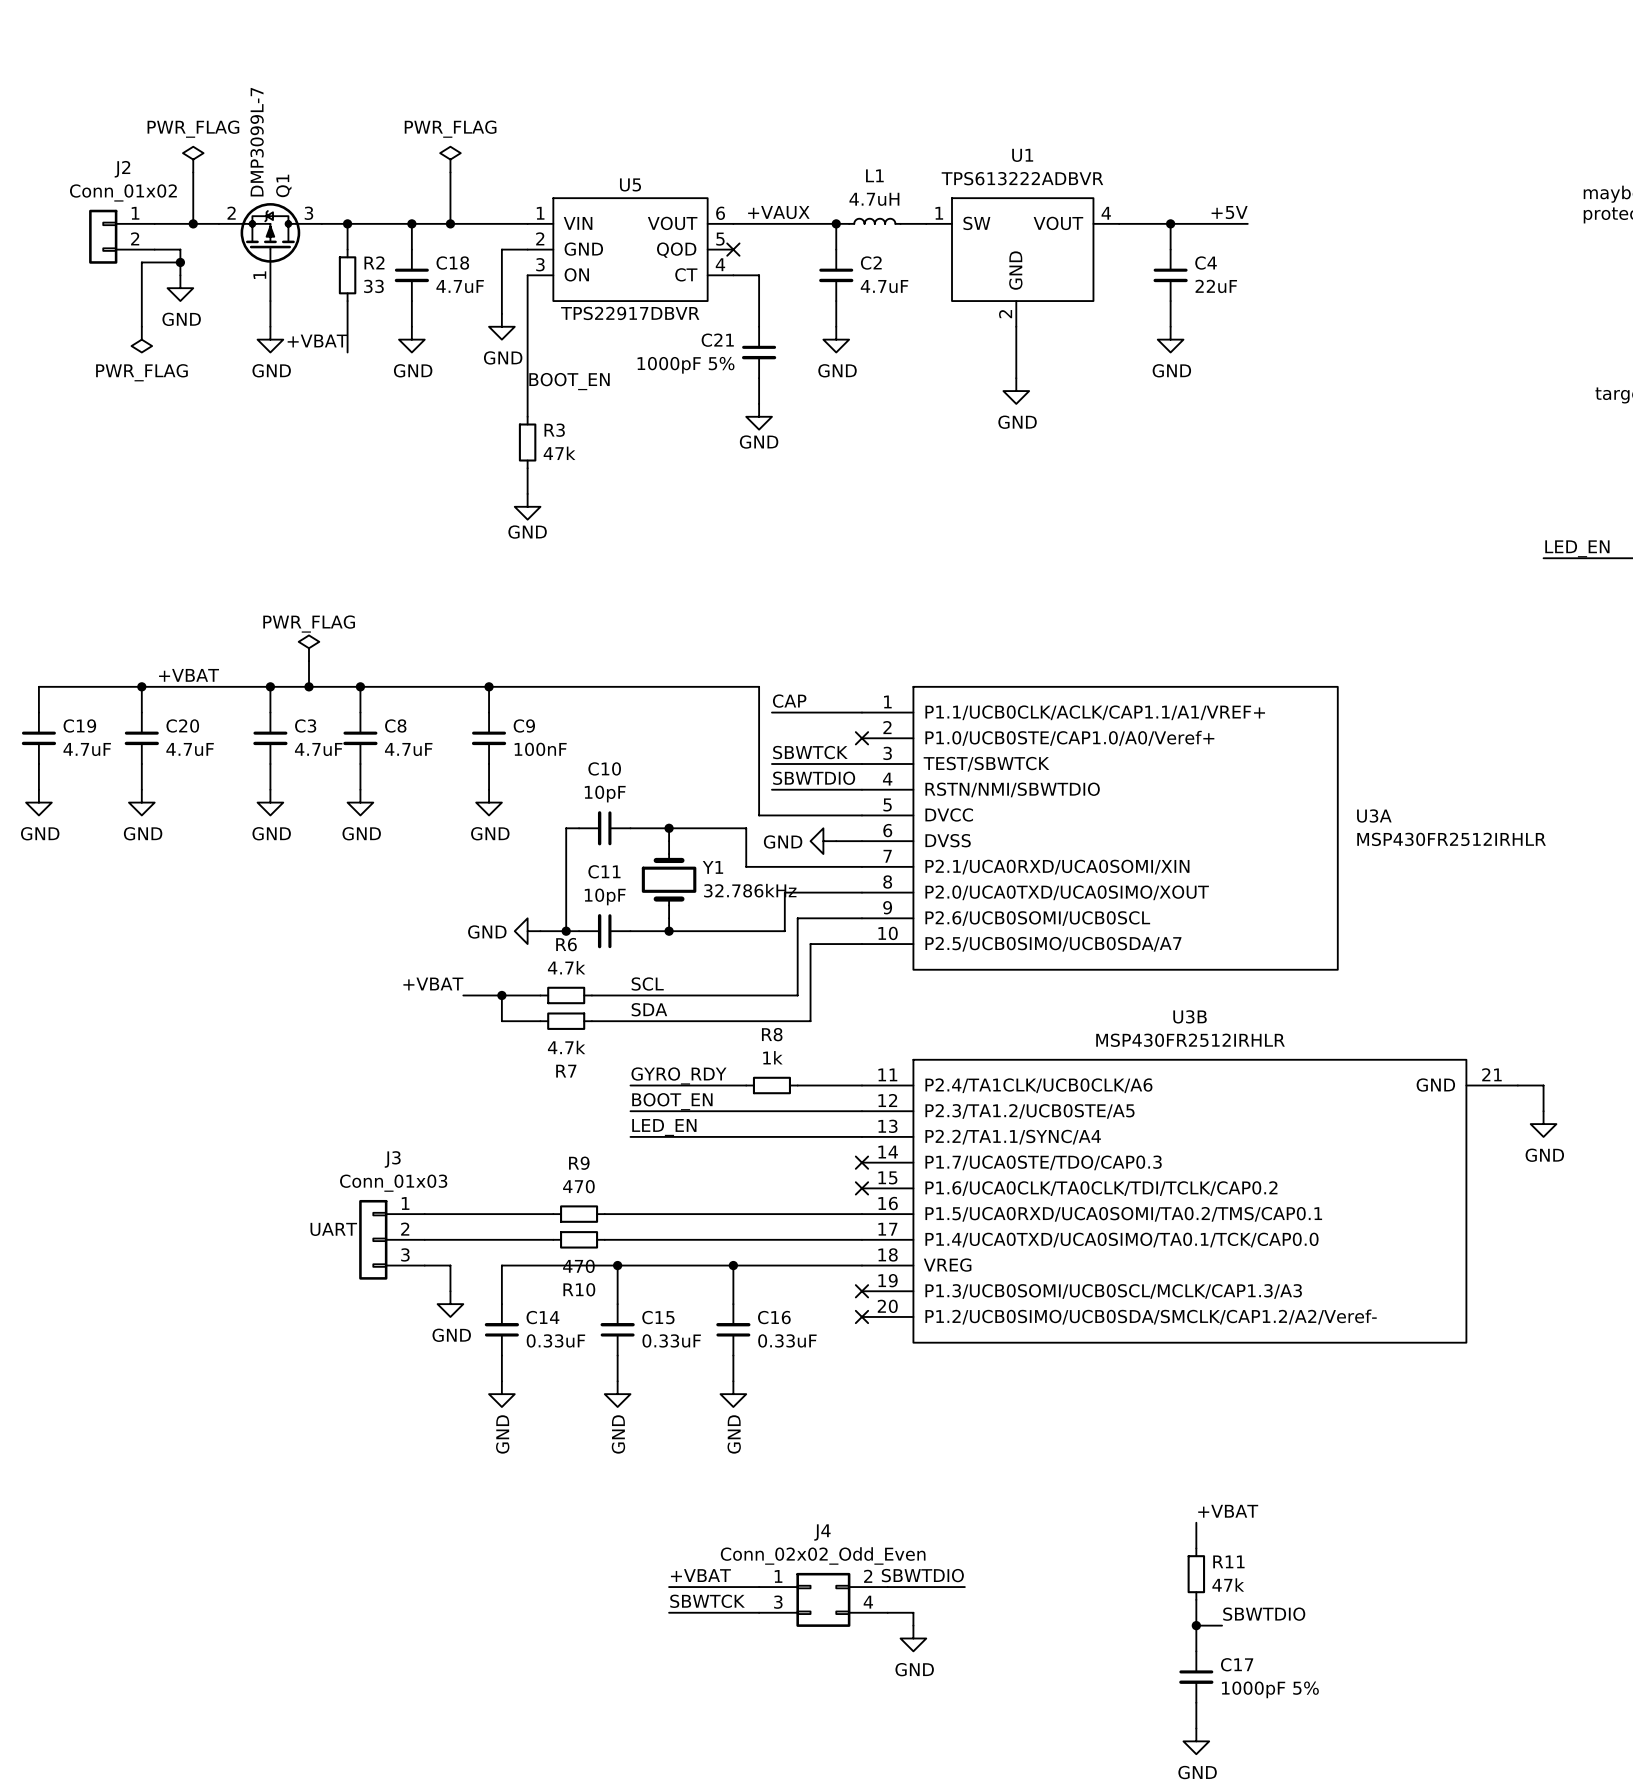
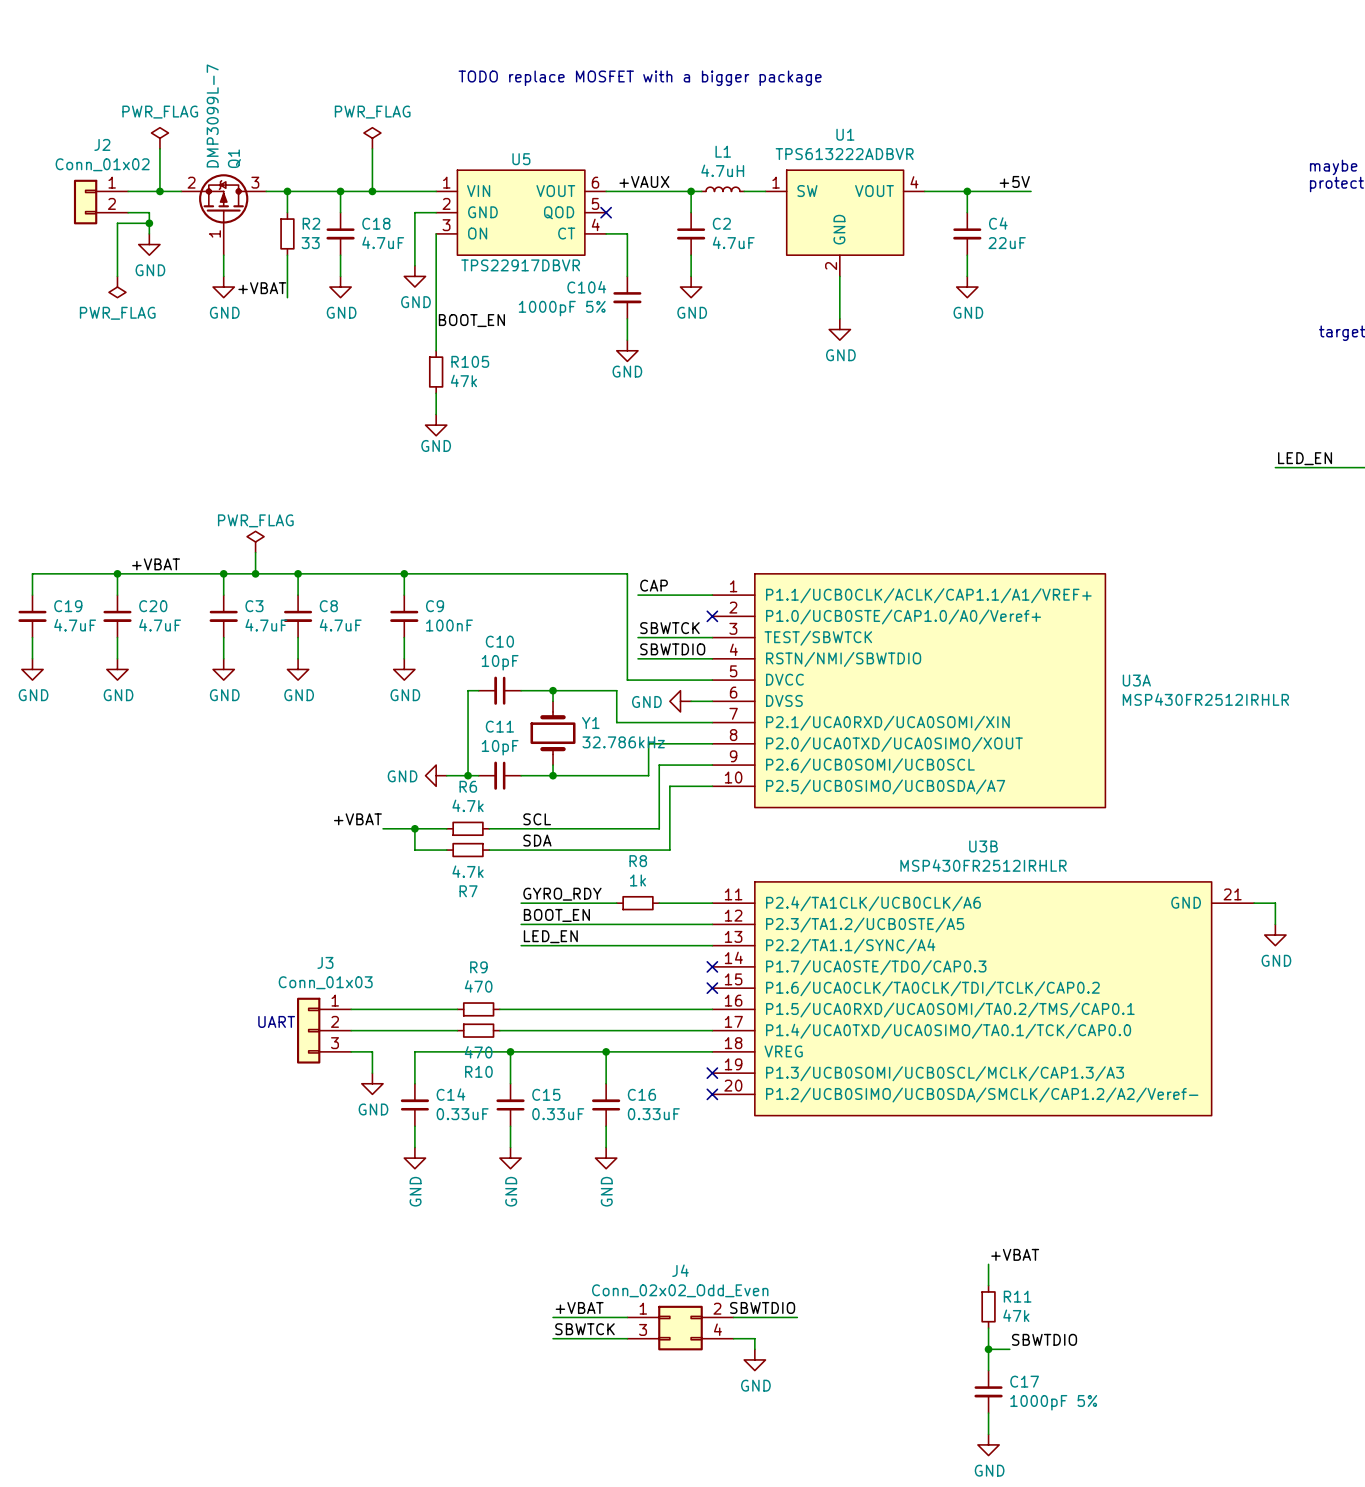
text: none -> TODO replace MOSFET with a bigger package (640, 78)
C21 name: C21 (717, 340) -> C104 (586, 287)
R3 name: R3 (554, 430) -> R105 (470, 361)

